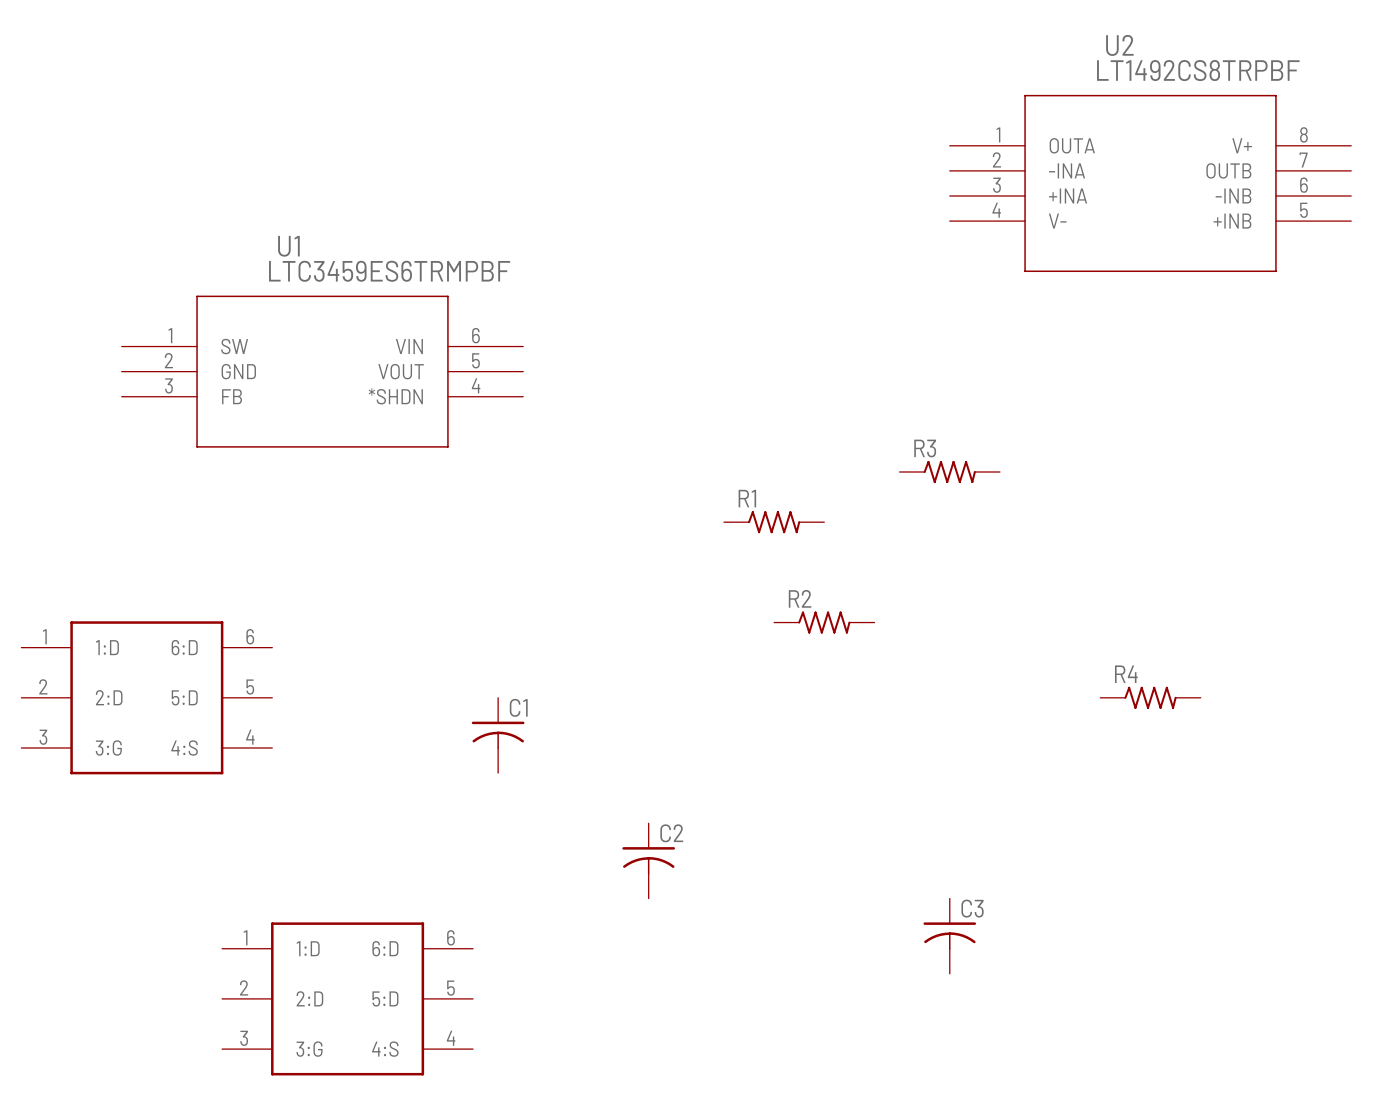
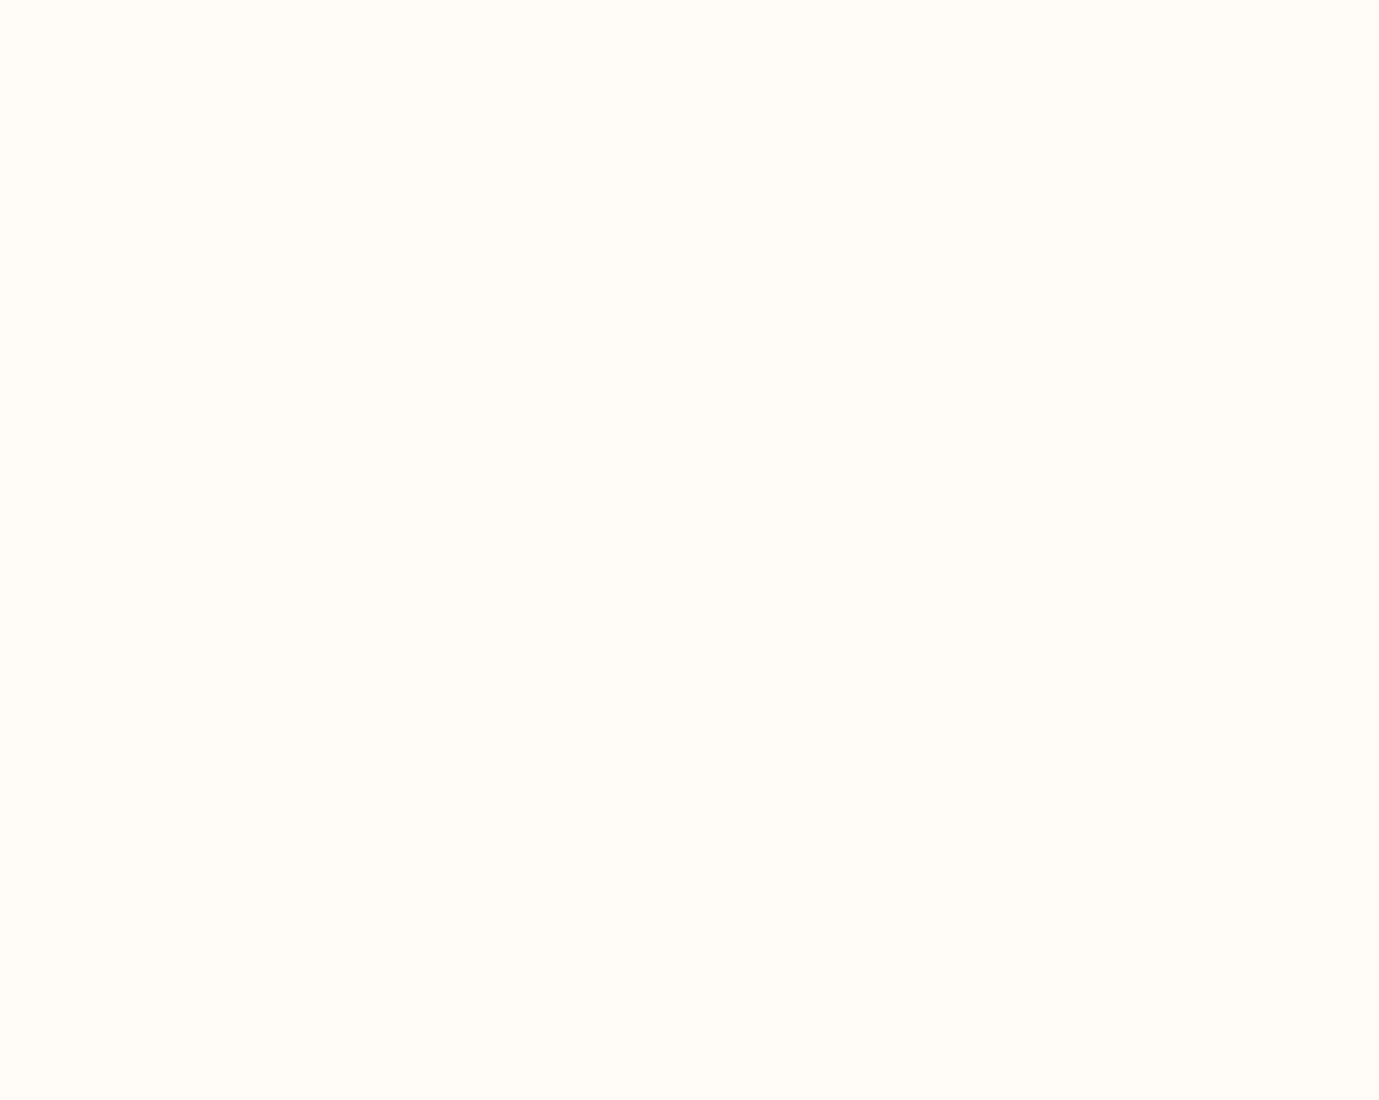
U2: LT1492CS8TRPBF (1150, 183) -> none
U1: LTC3459ES6TRMPBF (322, 371) -> none
R3: (949, 471) -> none
R1: (774, 522) -> none
R2: (824, 622) -> none
part: (146, 697) -> none
R4: (1150, 697) -> none
C1: (498, 735) -> none
C2: (648, 860) -> none
C3: (949, 936) -> none
part: (347, 998) -> none

